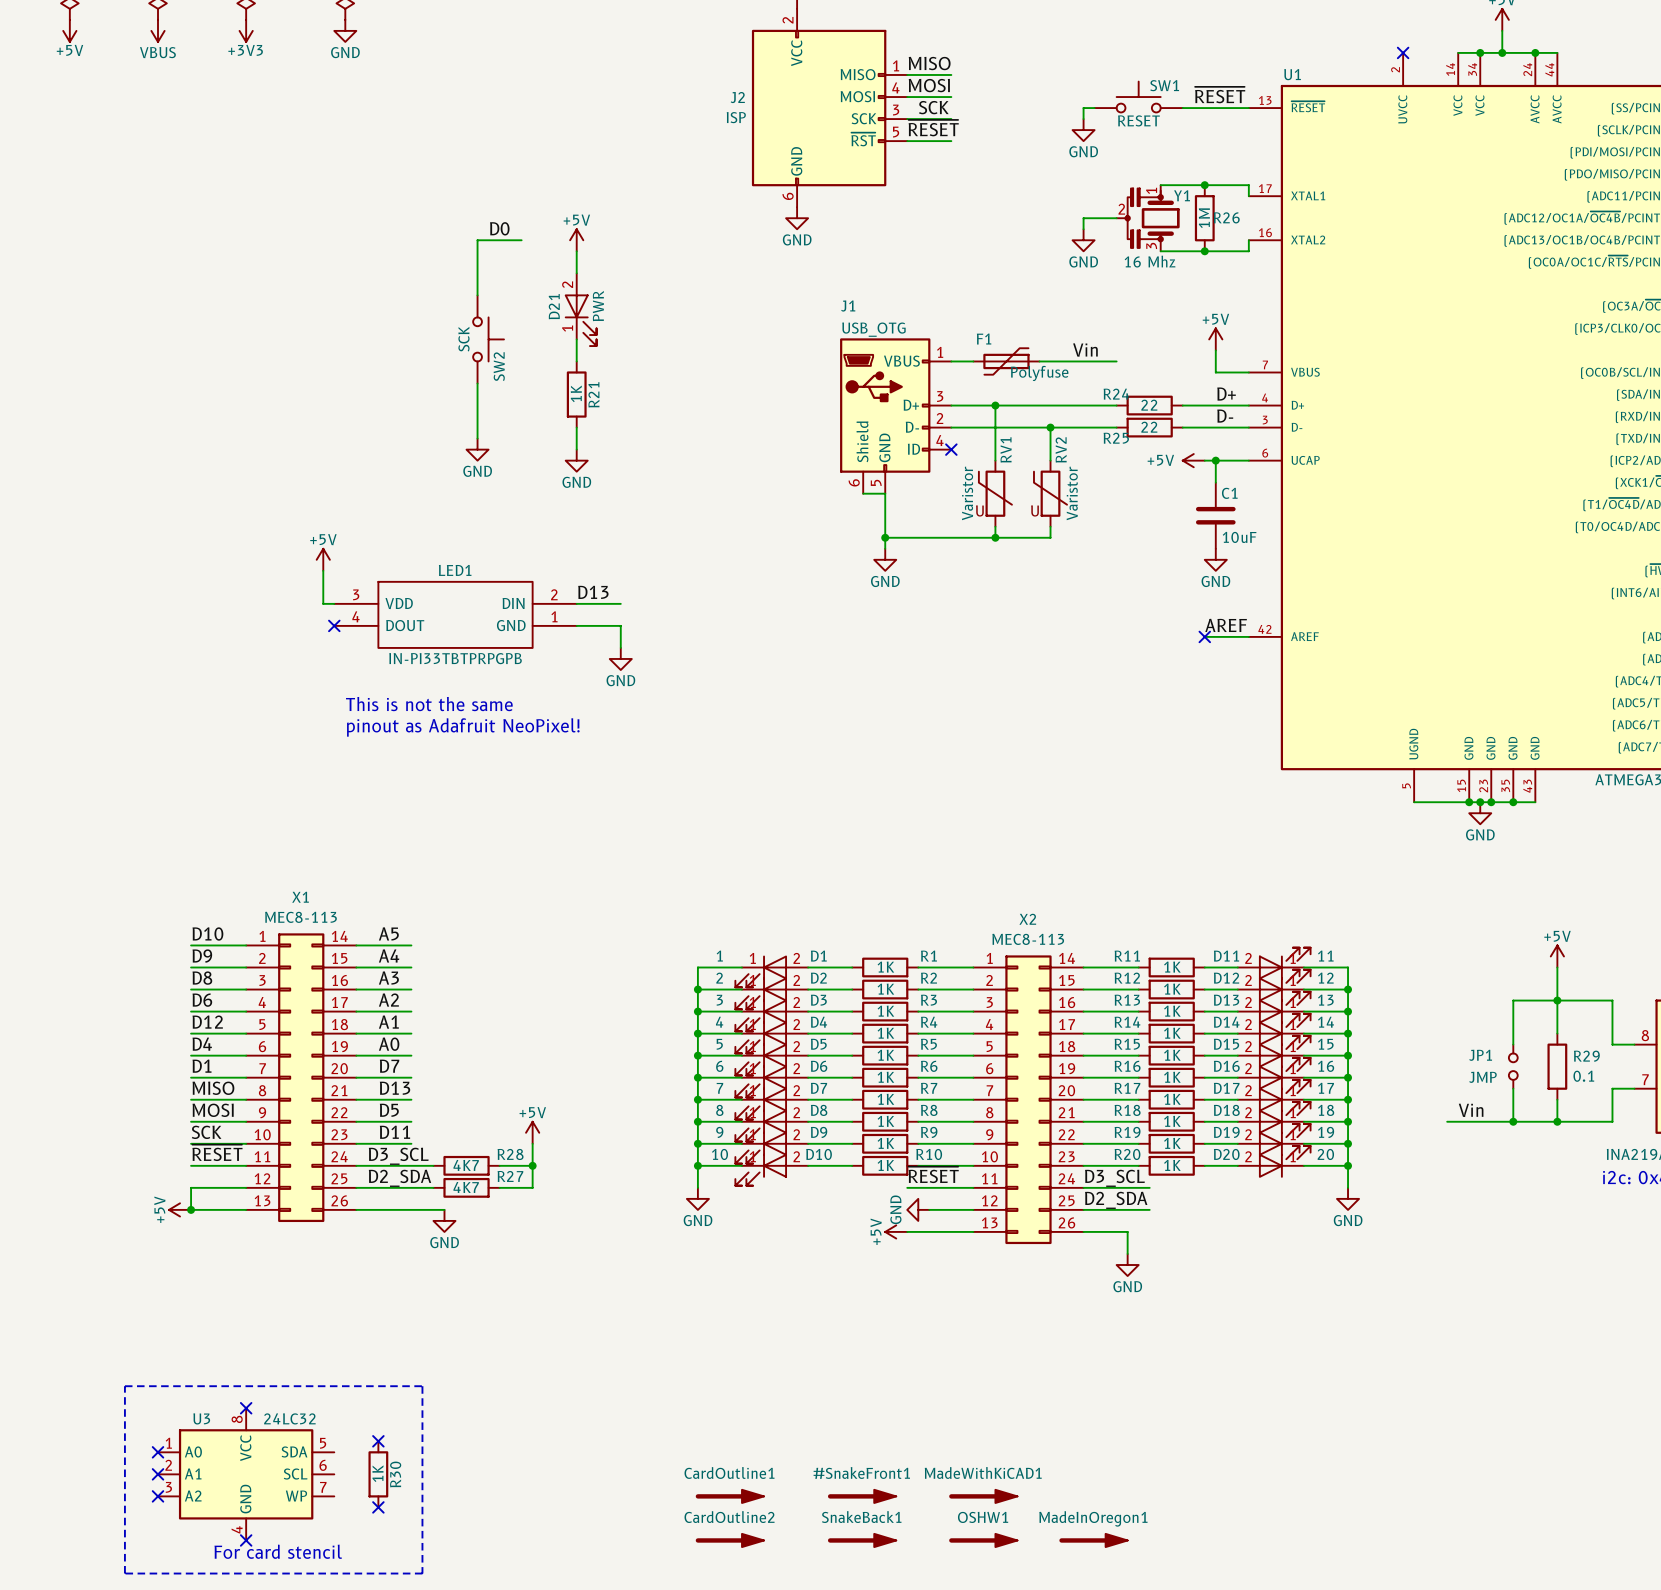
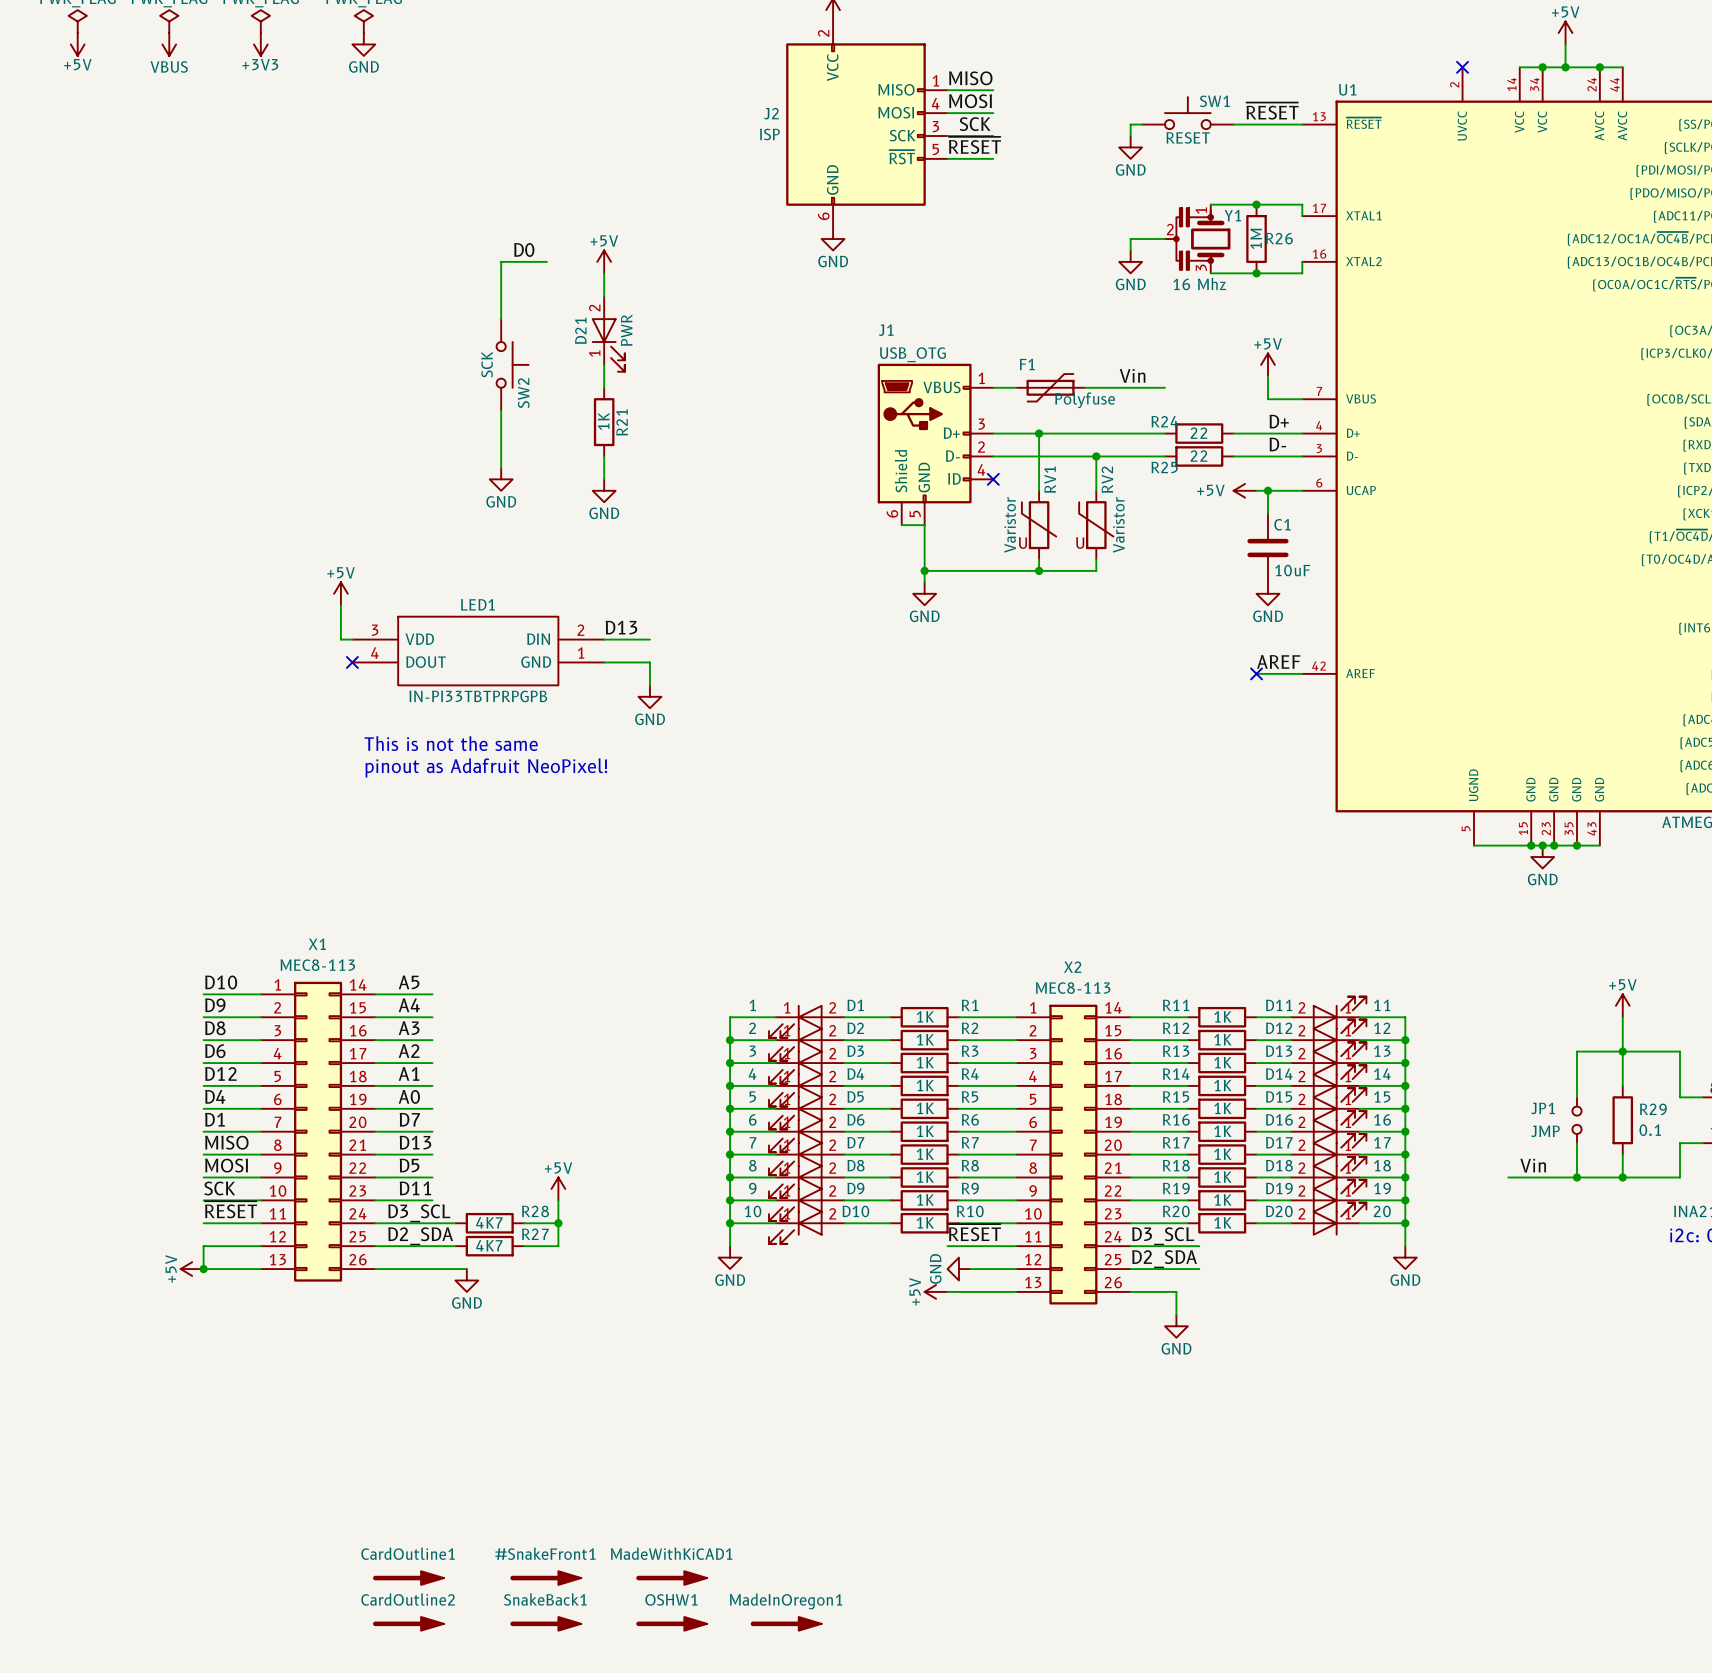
line: (124, 1386) (422, 1386) (422, 1573) (124, 1573) (124, 1386) -> none
no-connect mark: (246, 1408) -> none
no-connect mark: (378, 1441) -> none
no-connect mark: (158, 1452) -> none
no-connect mark: (158, 1474) -> none
U3: 24LC32 (246, 1474) -> none
R30: 1K (378, 1474) -> none
no-connect mark: (158, 1496) -> none
CardOutline1 position: (729, 1496) -> (408, 1578)
#SnakeFront1 position: (862, 1496) -> (545, 1578)
MadeWithKiCAD1 position: (983, 1496) -> (671, 1578)
no-connect mark: (378, 1507) -> none
no-connect mark: (246, 1540) -> none
CardOutline2 position: (729, 1540) -> (408, 1623)
SnakeBack1 position: (862, 1540) -> (545, 1623)
OSHW1 position: (983, 1540) -> (671, 1623)
MadeInOregon1 position: (1093, 1540) -> (786, 1623)
text: For card stencil (278, 1551) -> none

